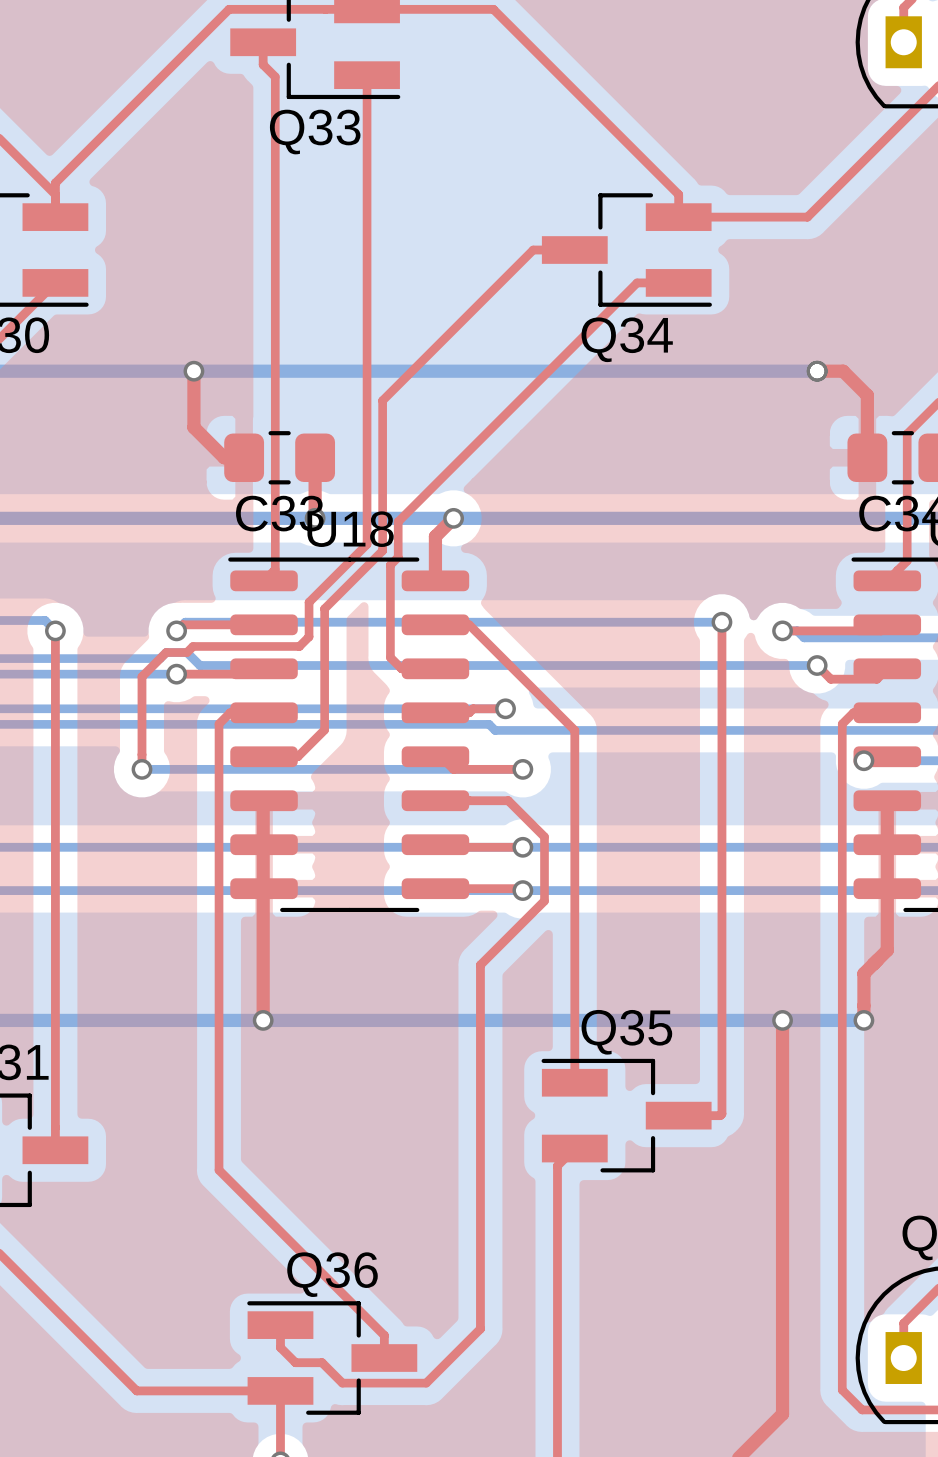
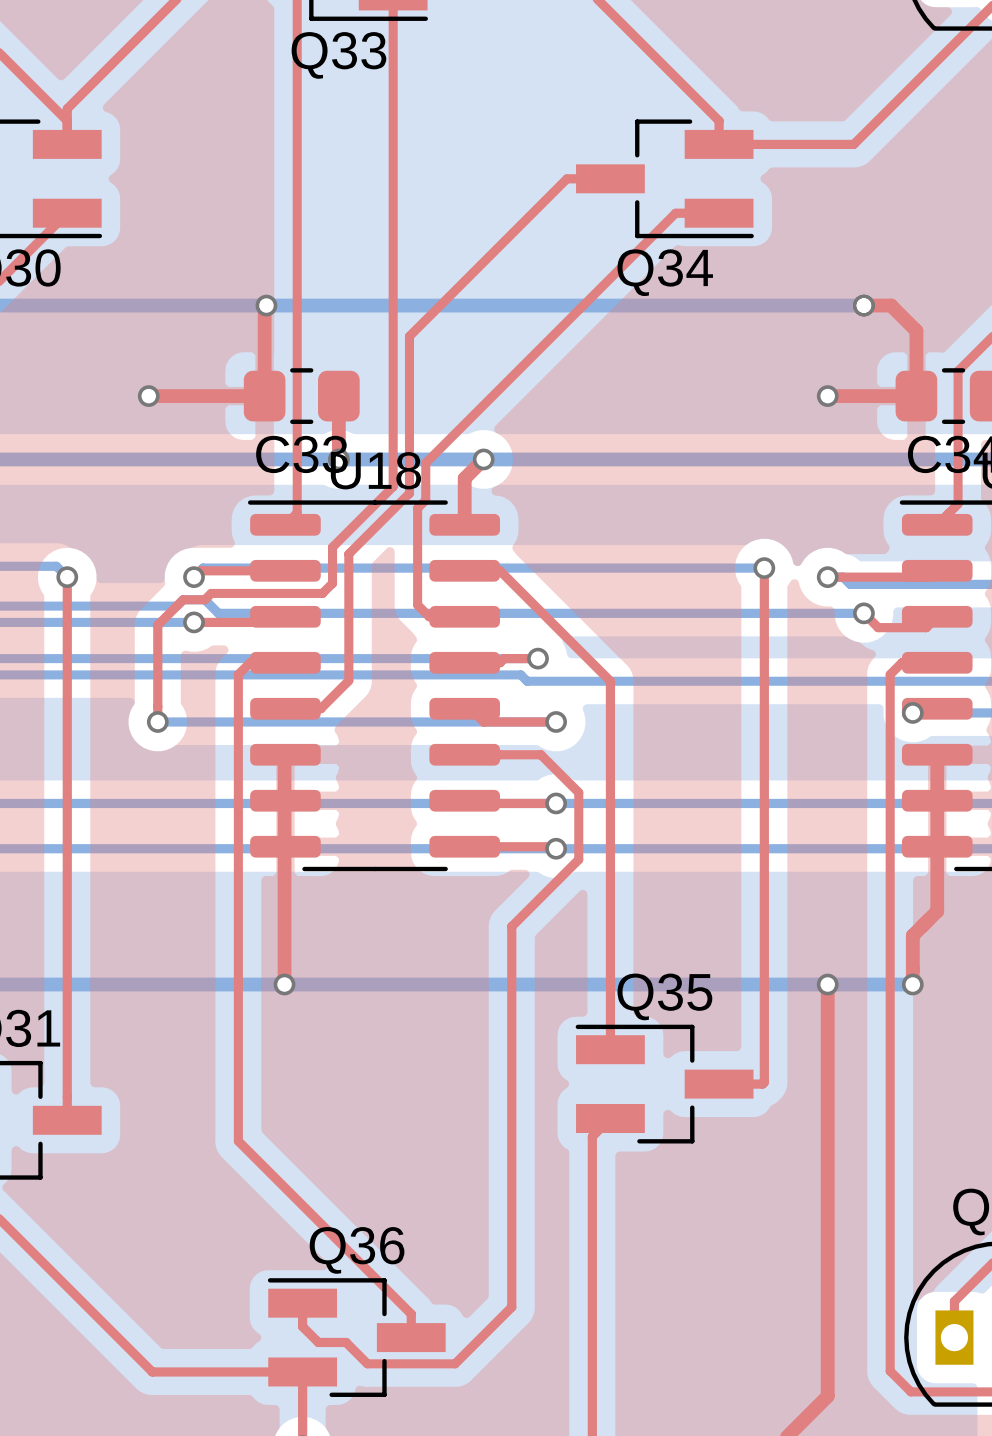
top track: (193, 371) (193, 427) (224, 457) -> (148, 396) (243, 396)
via position: (193, 371) -> (266, 305)
top track: none -> (266, 305) (264, 307) (264, 396)
via: none -> (148, 396)
top track: none -> (827, 396) (916, 396)
via: none -> (827, 396)

